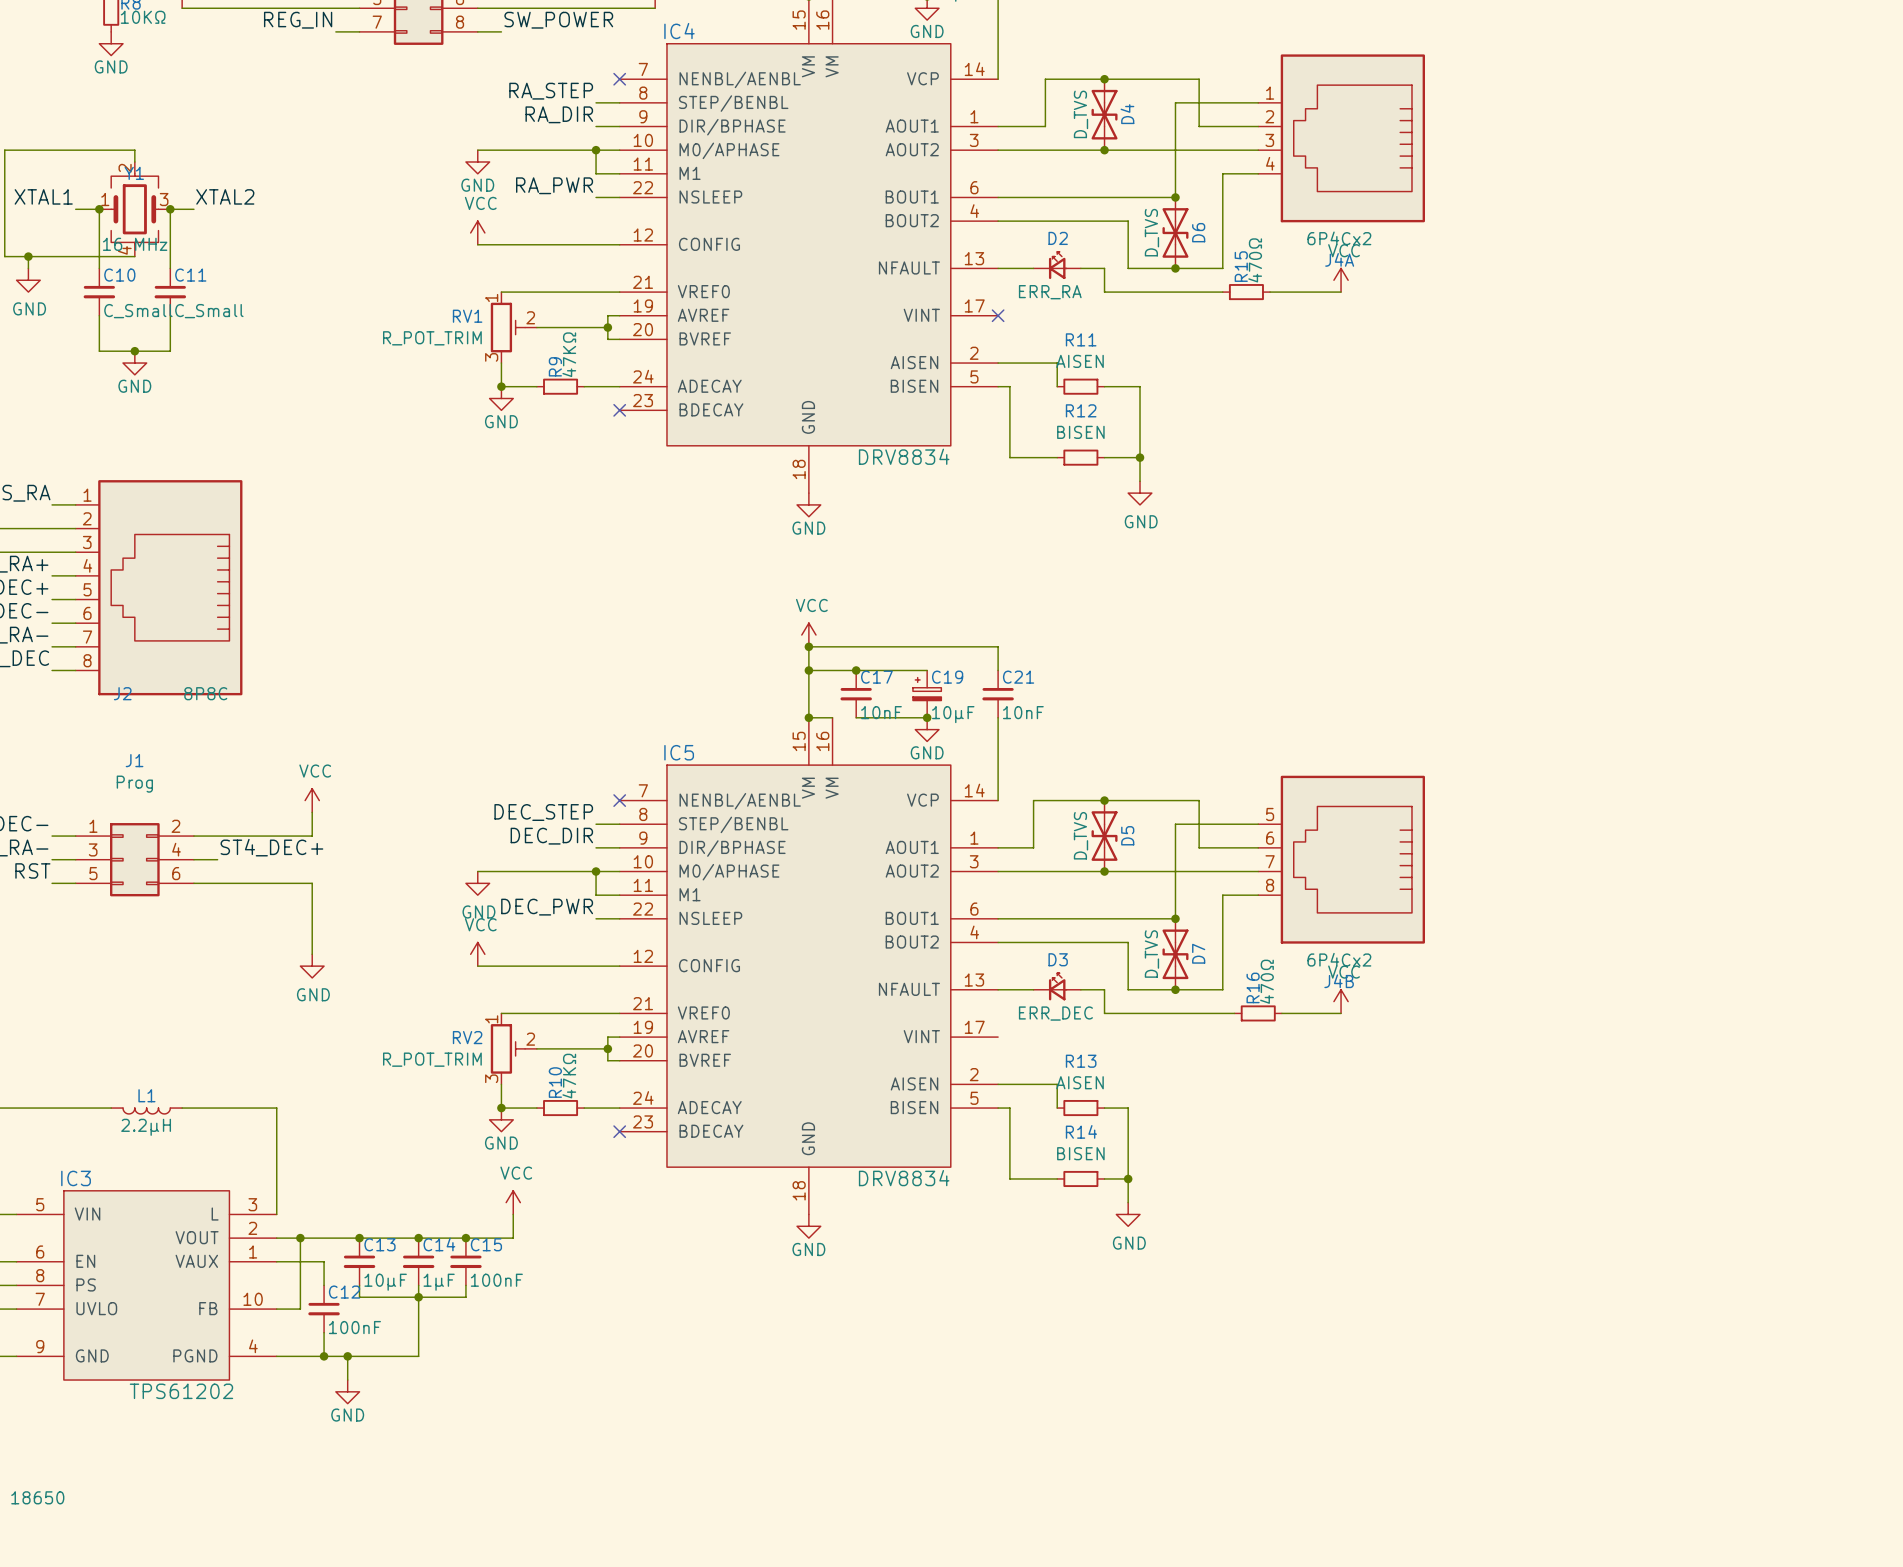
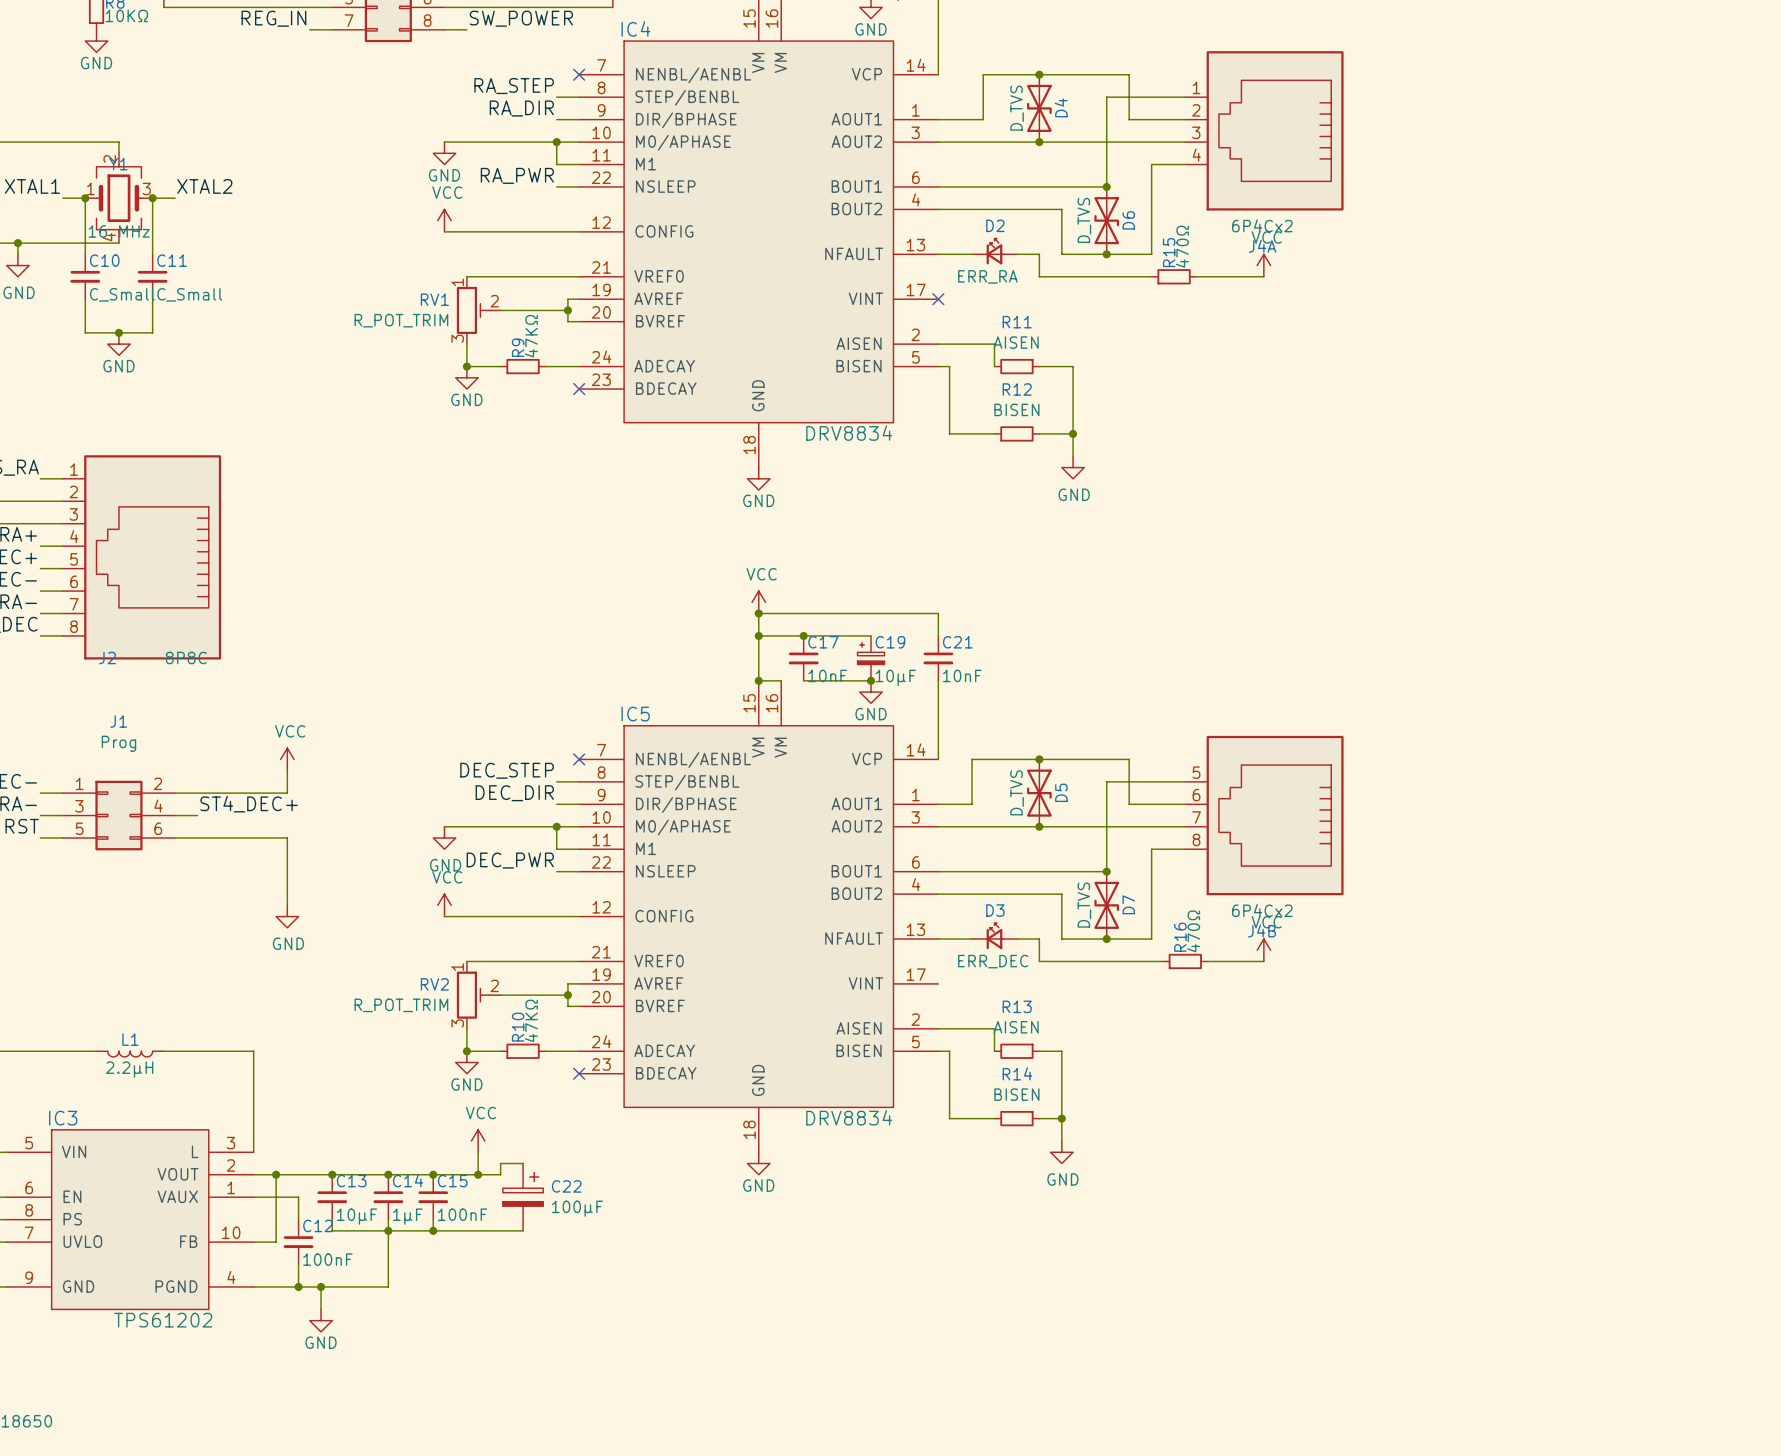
wire: none -> (523, 1163) (500, 1163) (500, 1174) (478, 1174)
junction: none -> (478, 1174)
C22: none -> 100µF (523, 1197)
wire: none -> (433, 1230) (523, 1230)
junction: none -> (433, 1230)

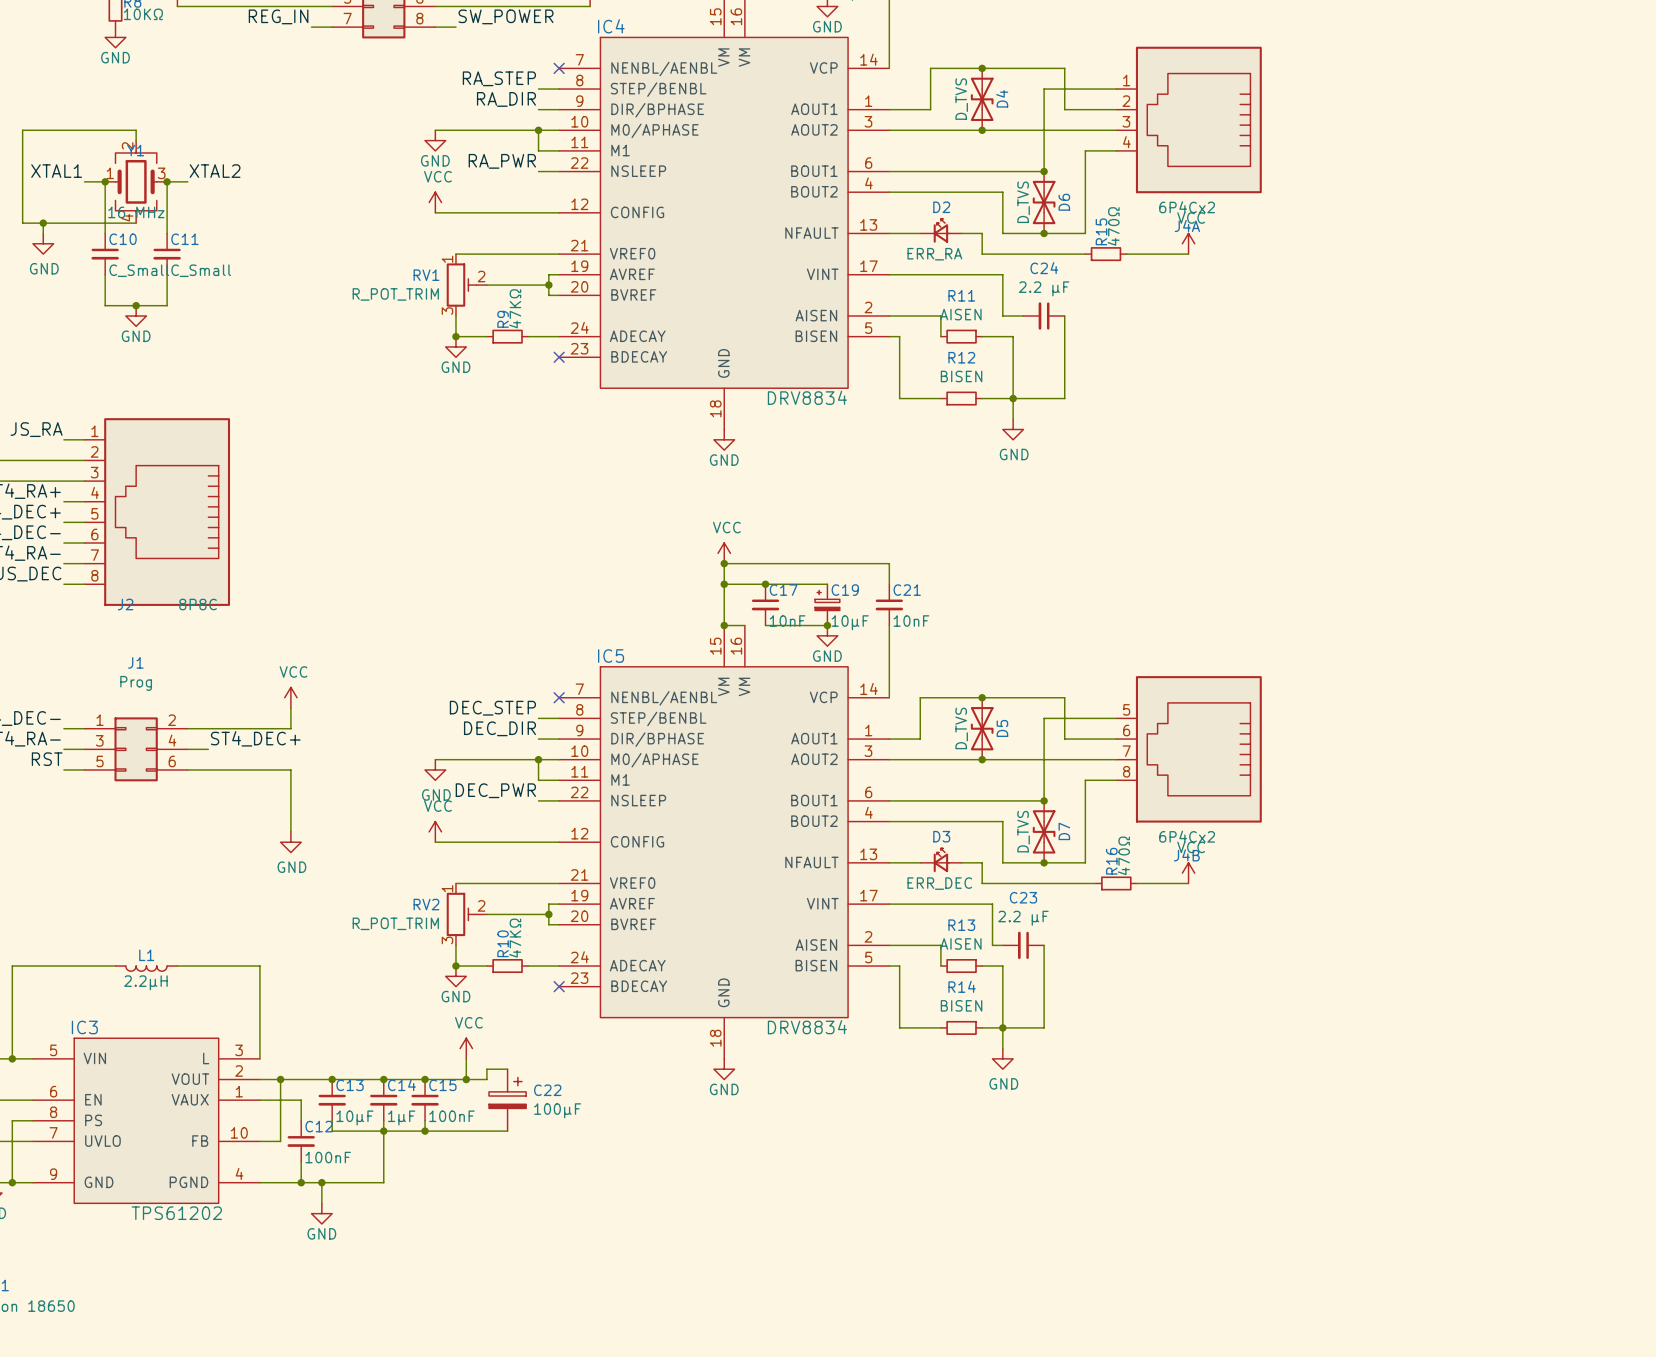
wire: none -> (889, 274) (1002, 274) (1002, 316) (1023, 316)
no-connect mark: (938, 299) -> none
C24: none -> 2.2 µF (1044, 316)
wire: none -> (1064, 316) (1064, 398) (1013, 398)
wire: none -> (889, 904) (992, 904) (992, 945) (1002, 945)
C23: none -> 2.2 µF (1023, 945)
wire: none -> (1044, 945) (1044, 1027) (1002, 1027)

